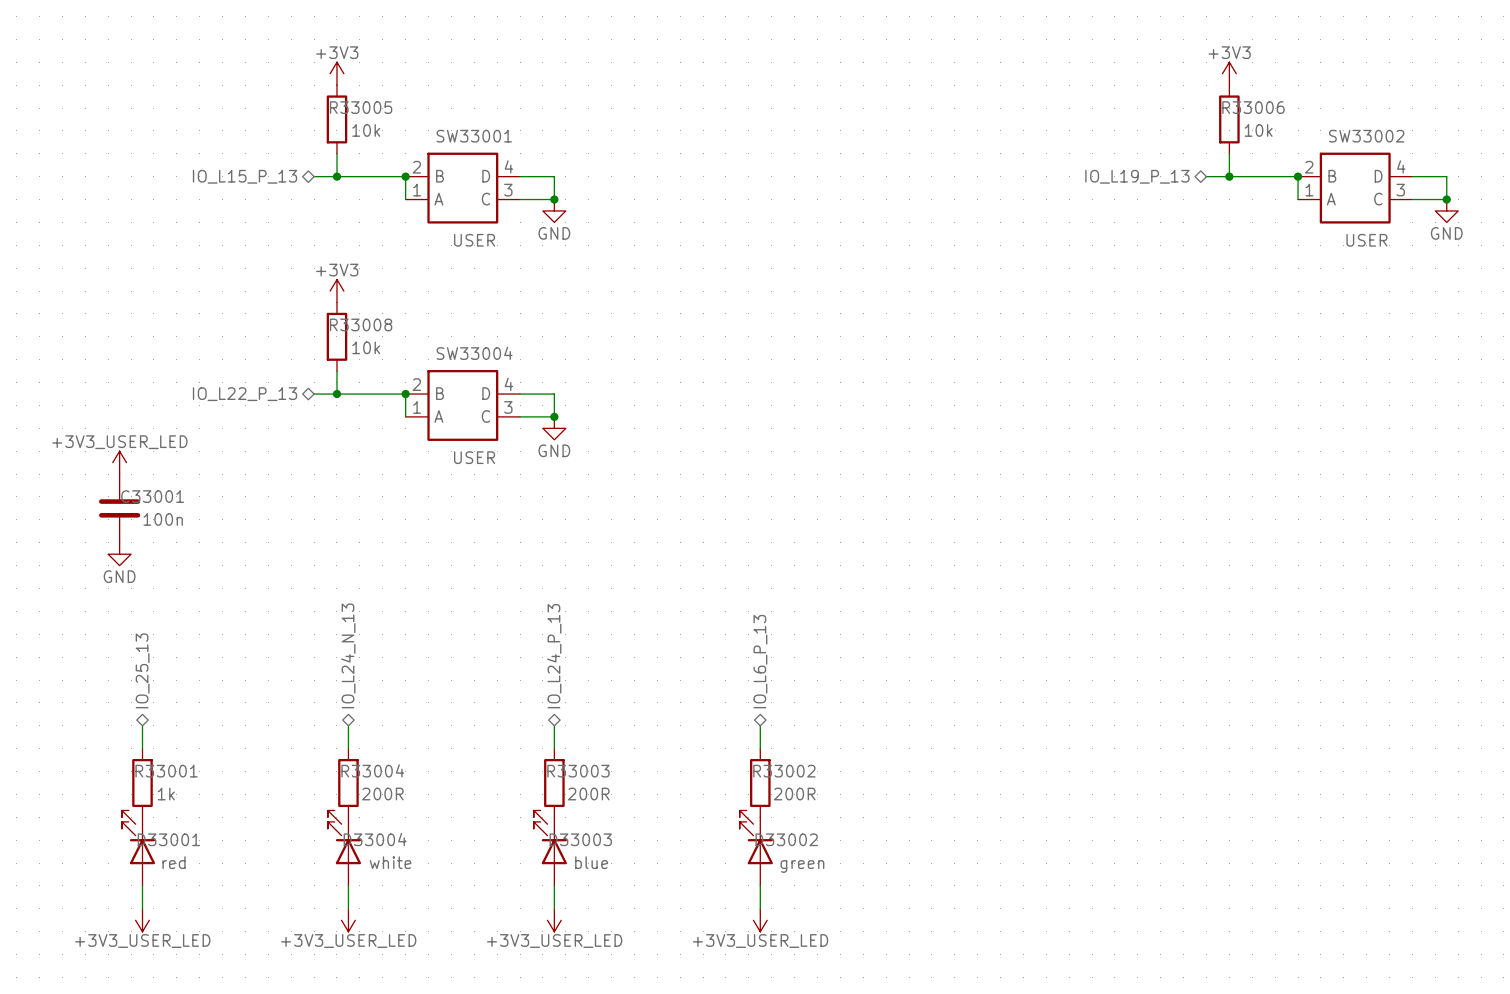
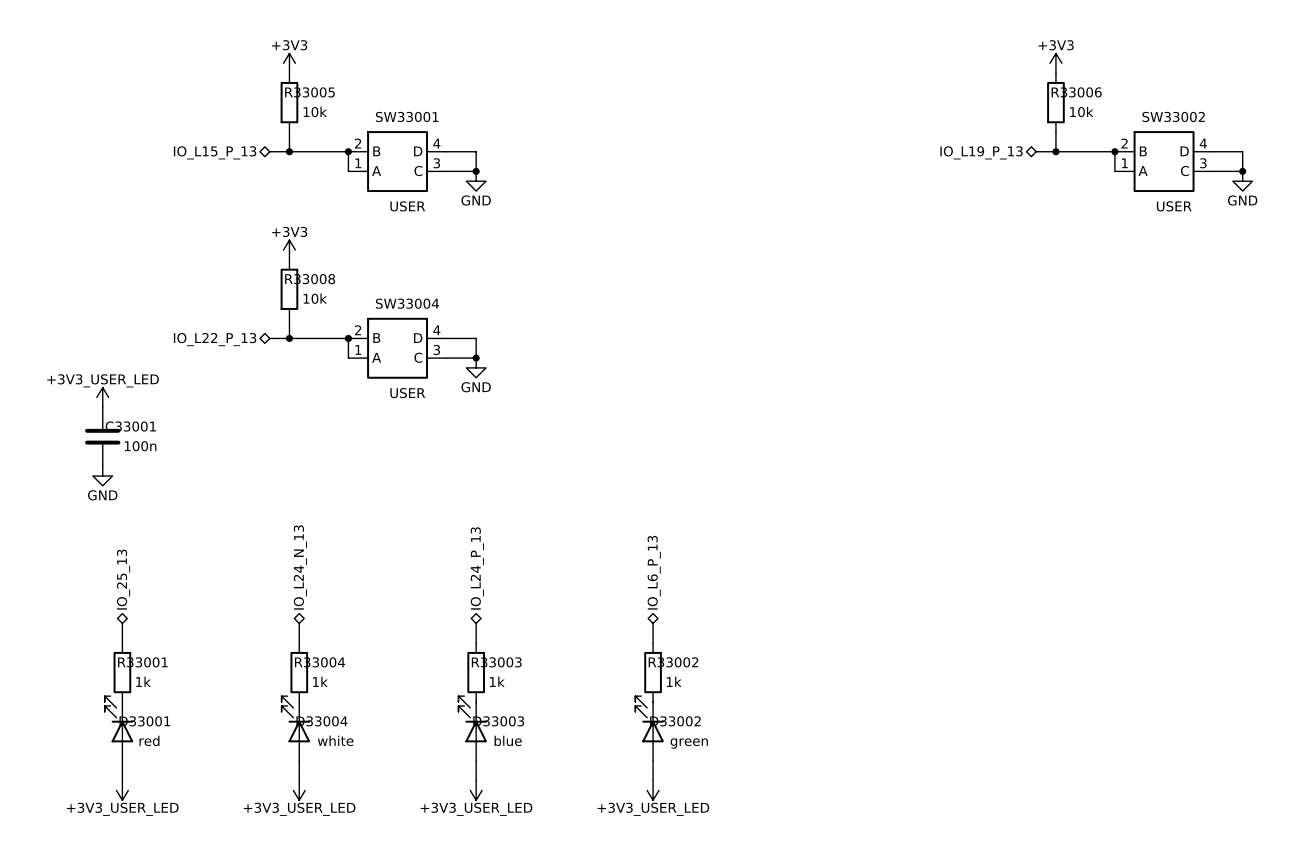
R33004 value: 200R (382, 794) -> 1k (320, 681)
R33003 value: 200R (588, 794) -> 1k (497, 681)
R33002 value: 200R (794, 794) -> 1k (674, 681)

